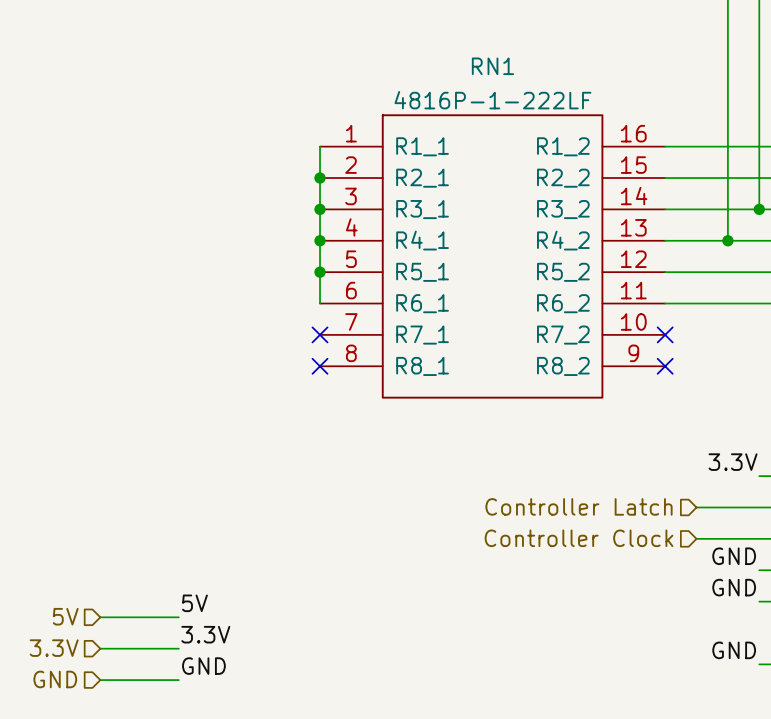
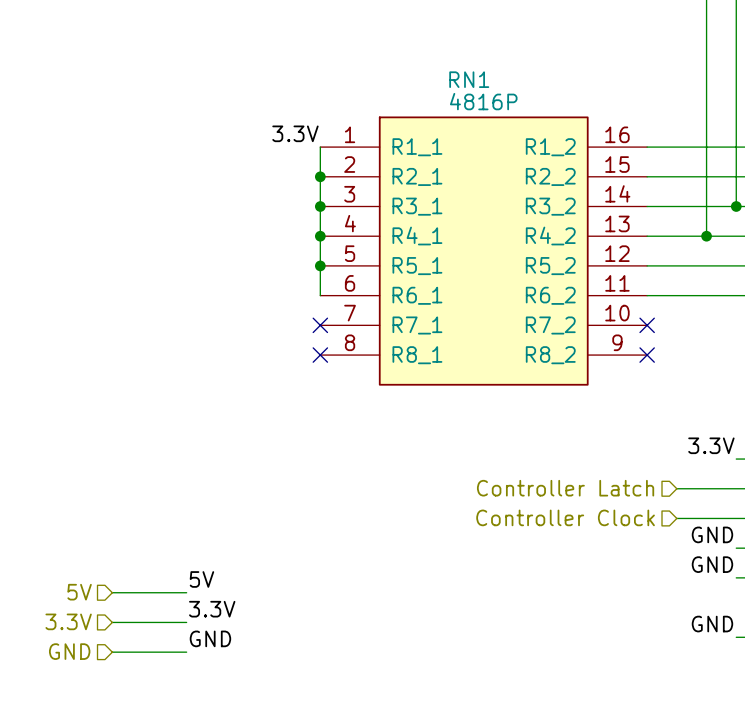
RN1 text: none -> 4816P (483, 101)
RN1 value: 4816P-1-222LF (492, 100) -> none
RN1 symbol: [320, 114, 666, 399] -> [320, 116, 648, 386]
label: none -> 3.3V (295, 133)

